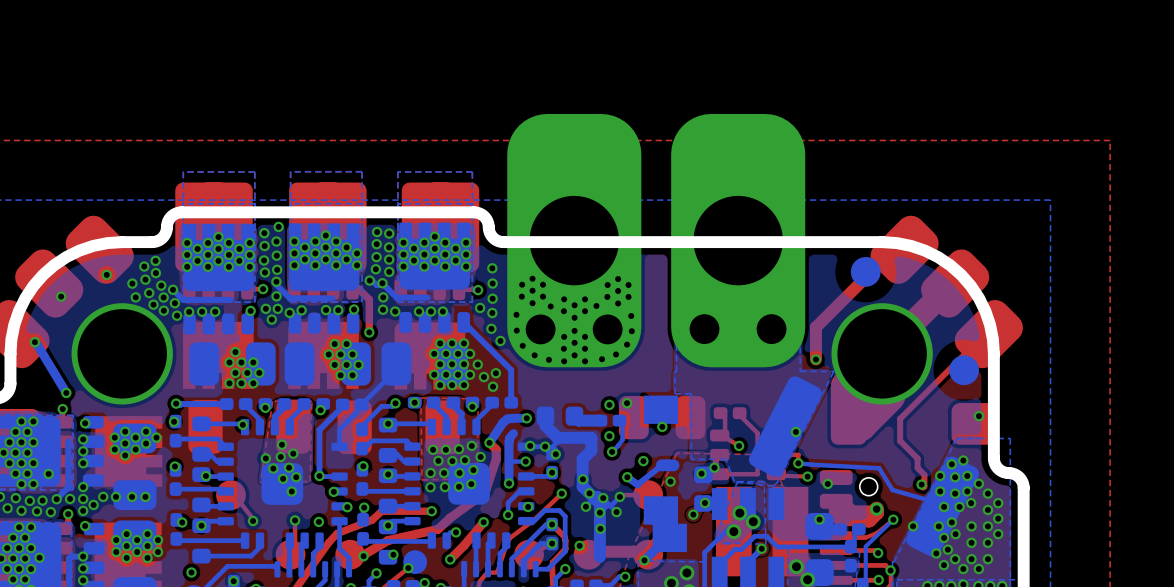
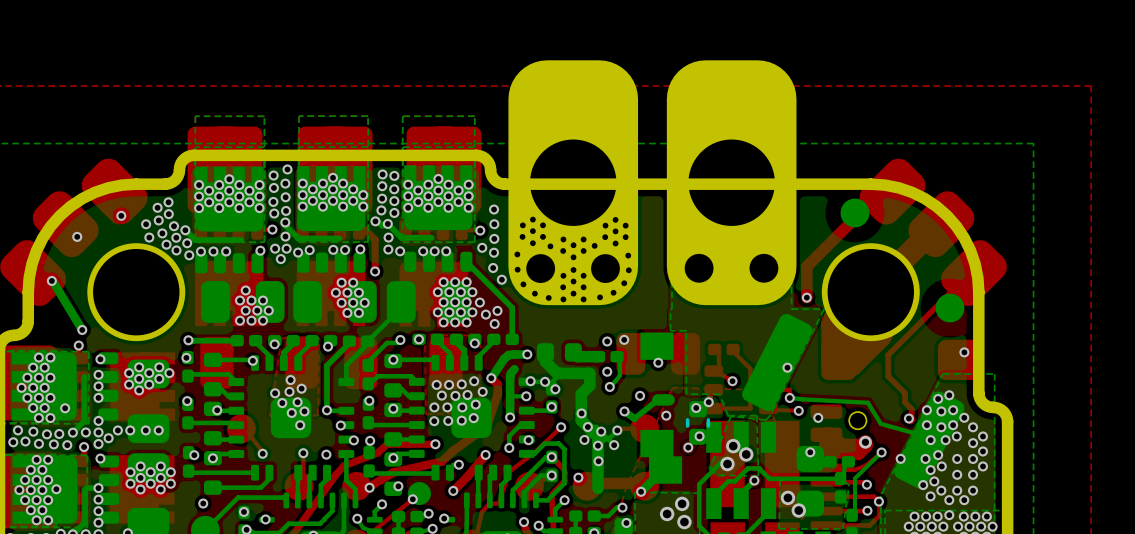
part footprint: [694, 466, 713, 512] -> [685, 401, 711, 445]

